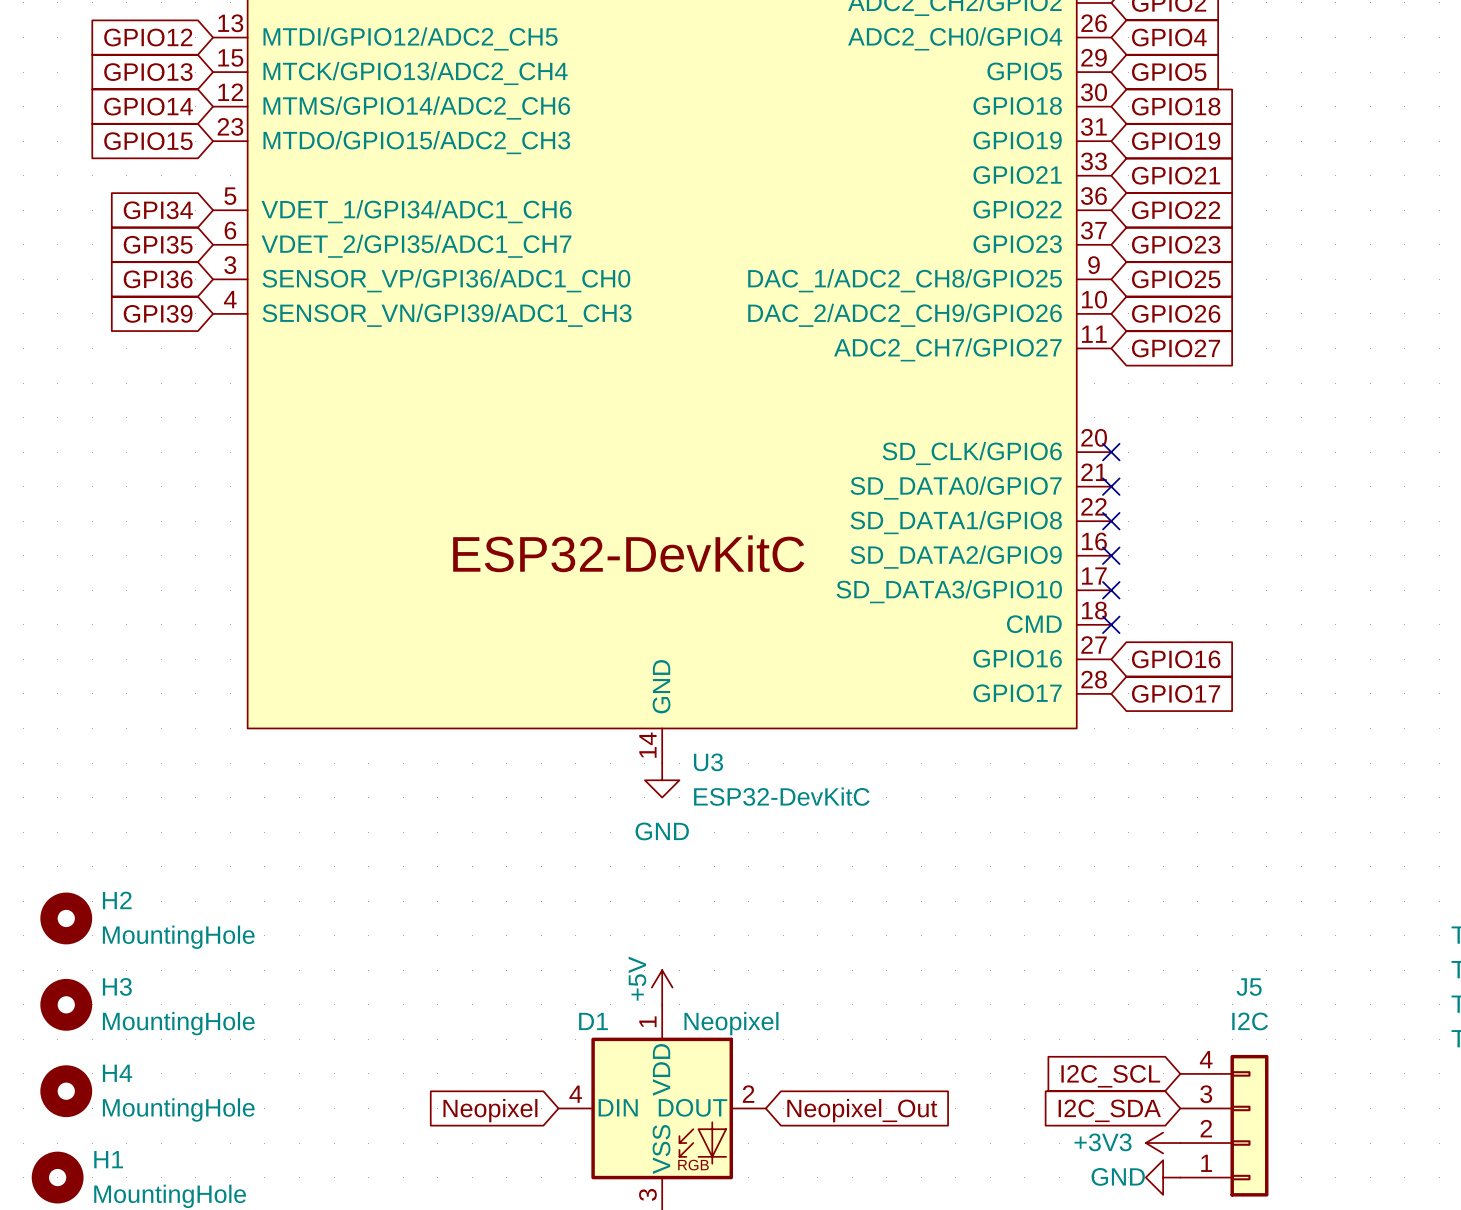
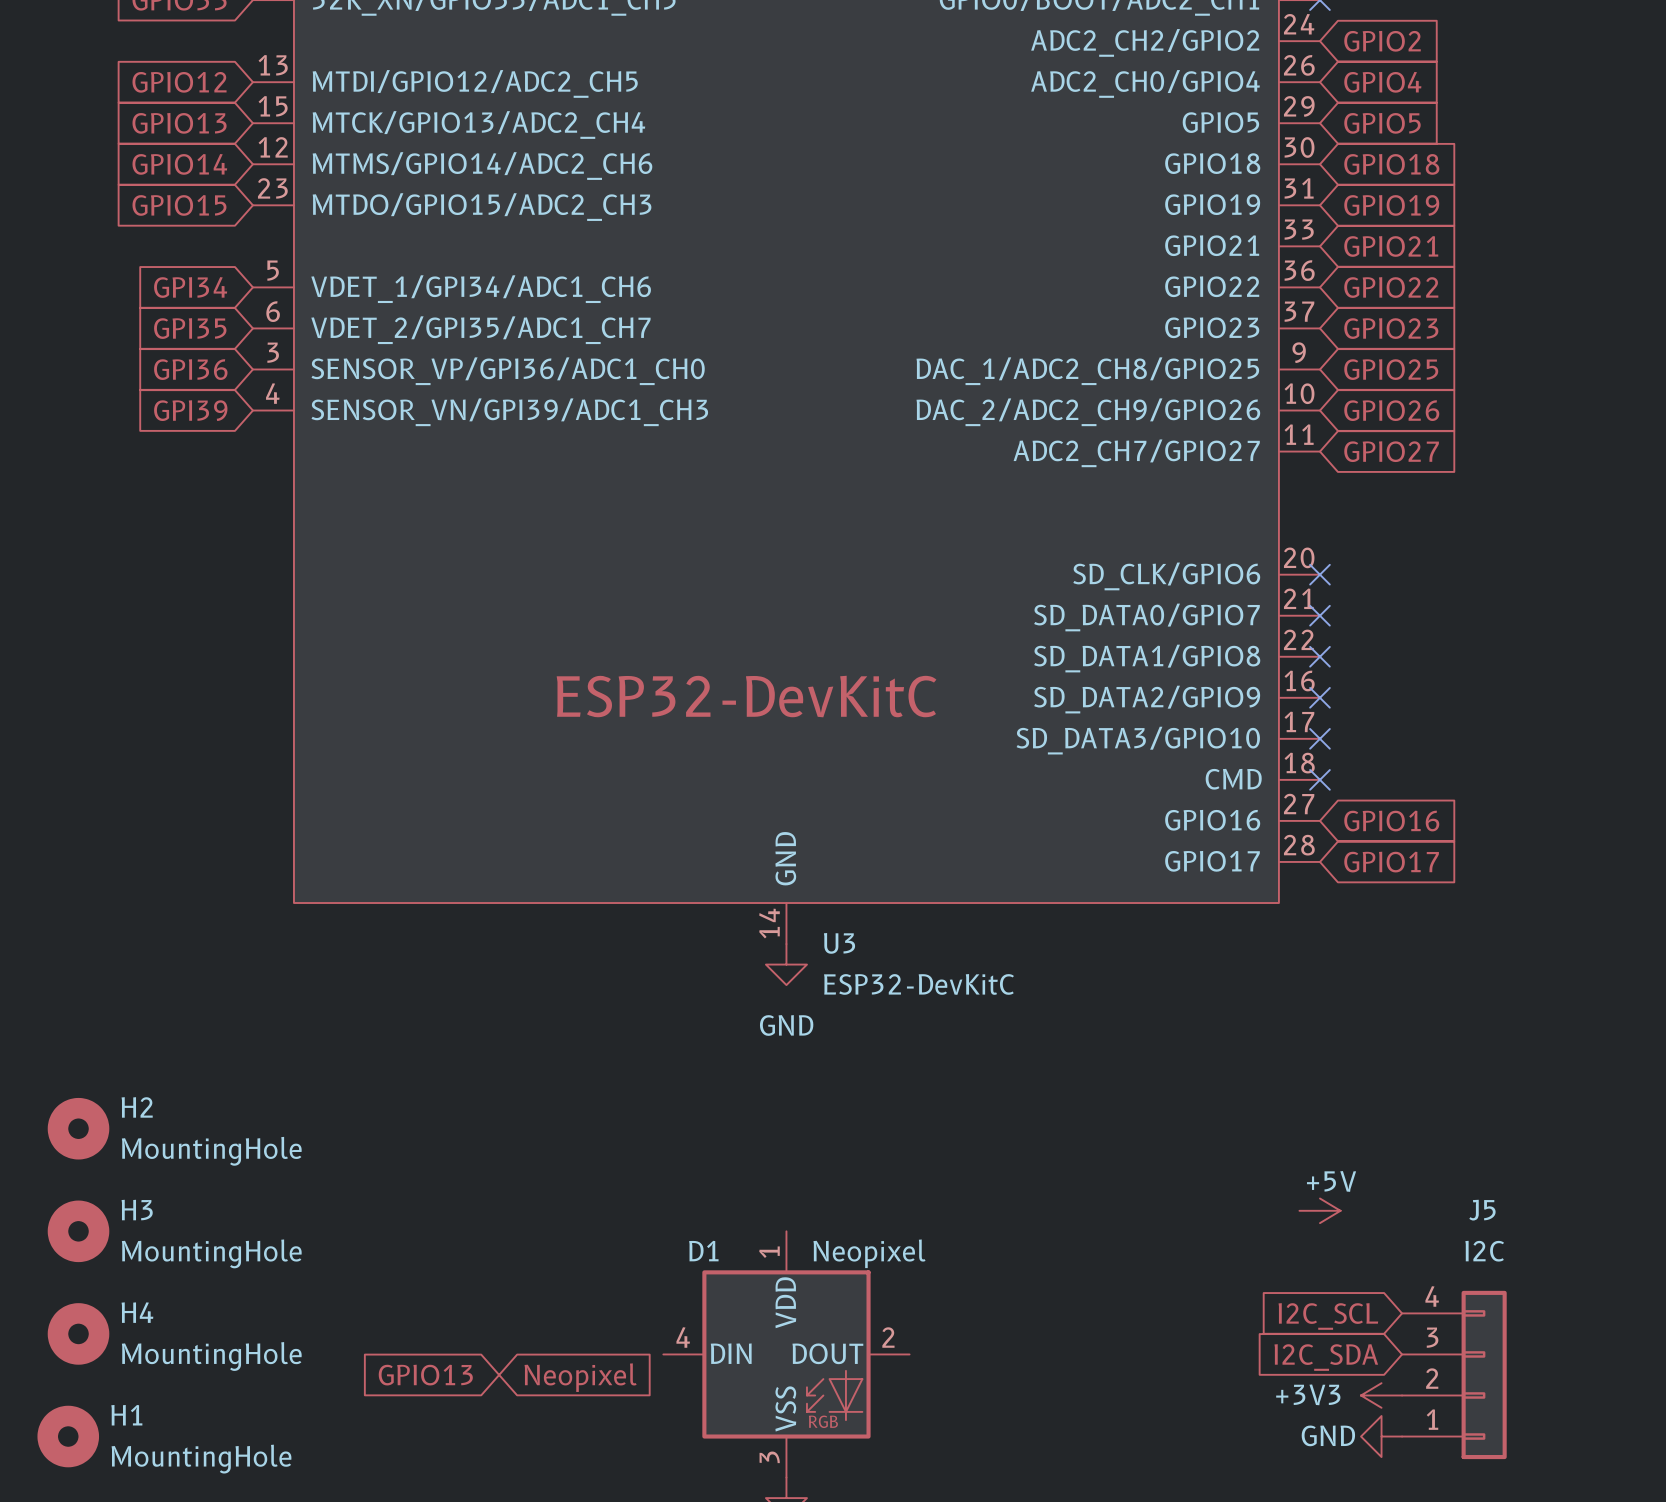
power symbol: +5V (662, 987) -> none
power symbol: none -> +5V (1319, 1210)
global label rotation: 0° (490, 1110) -> 180° (580, 1377)
global label: Neopixel_Out (862, 1110) -> none
global label: none -> GPIO13 (425, 1375)

